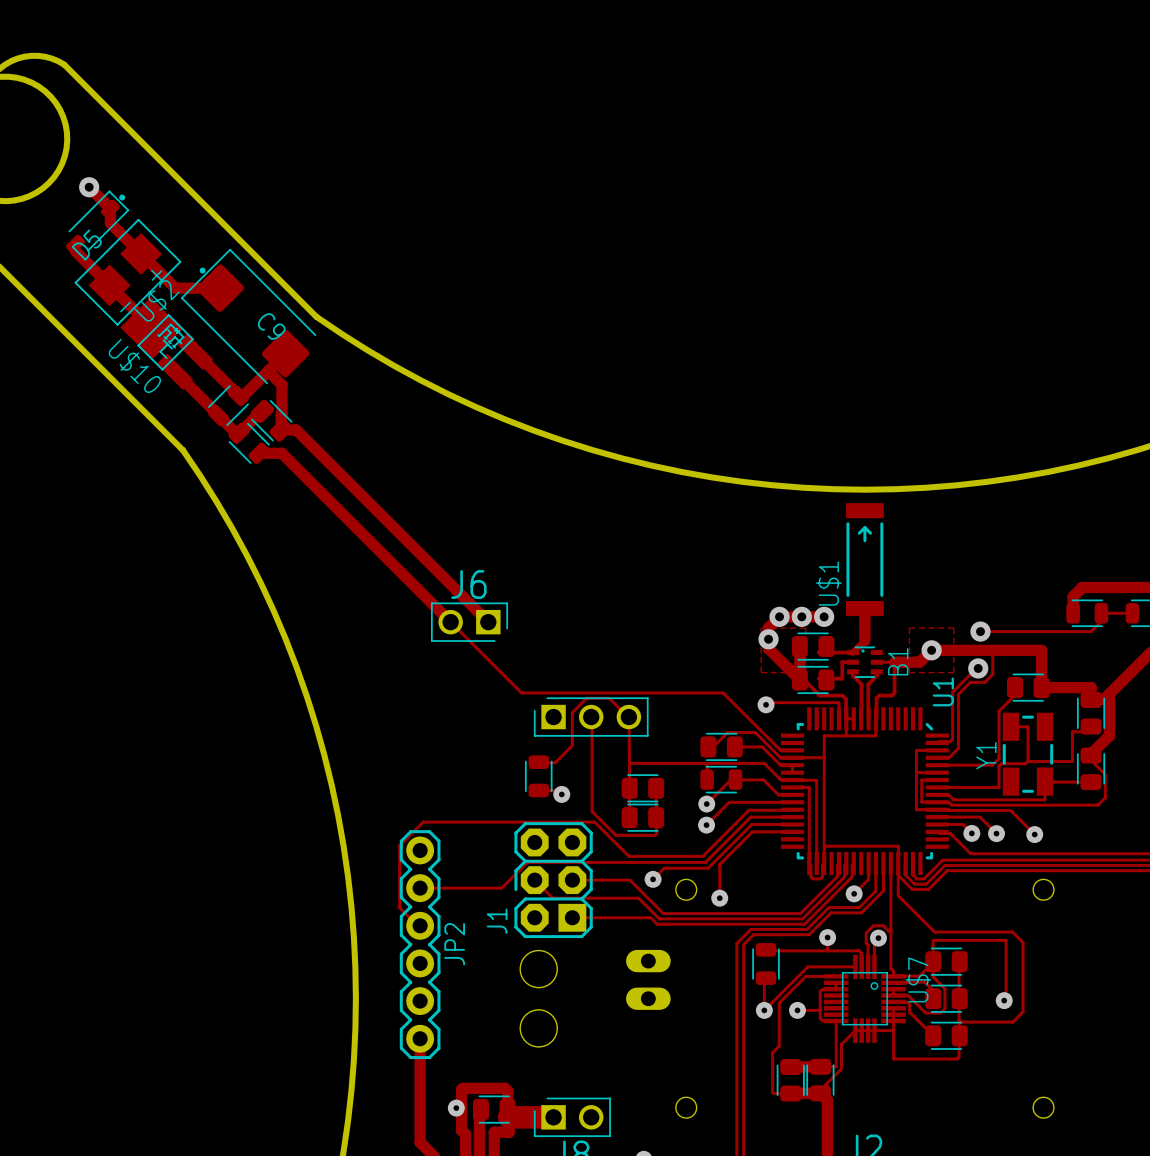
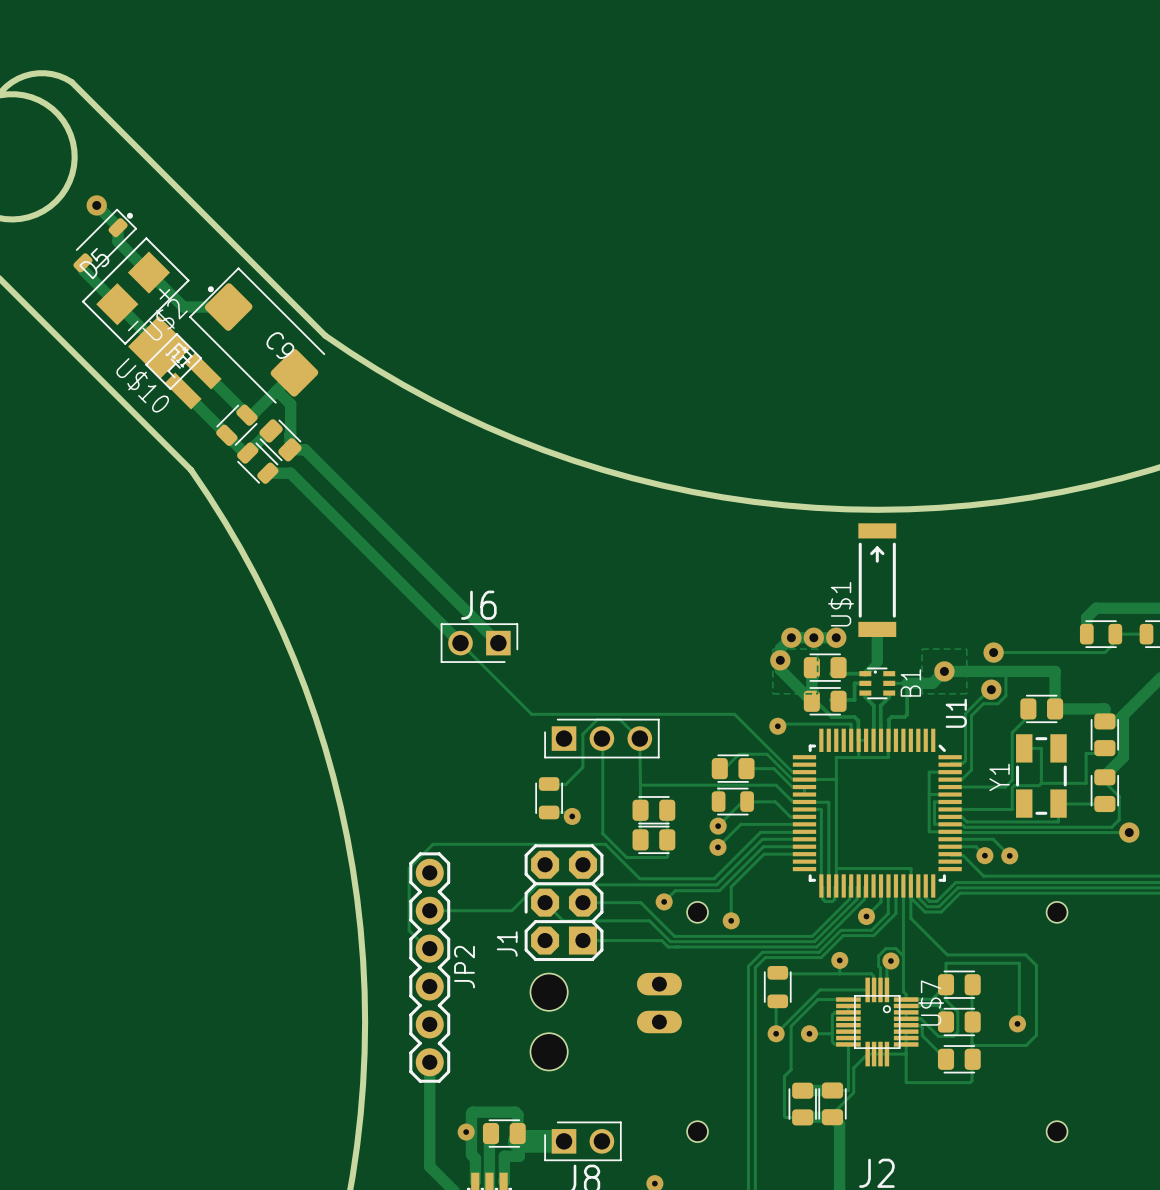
track: (1010, 810) (1034, 834) -> (1023, 832) (1129, 832)
via: none -> (1129, 832)
via: (1034, 834) -> none

